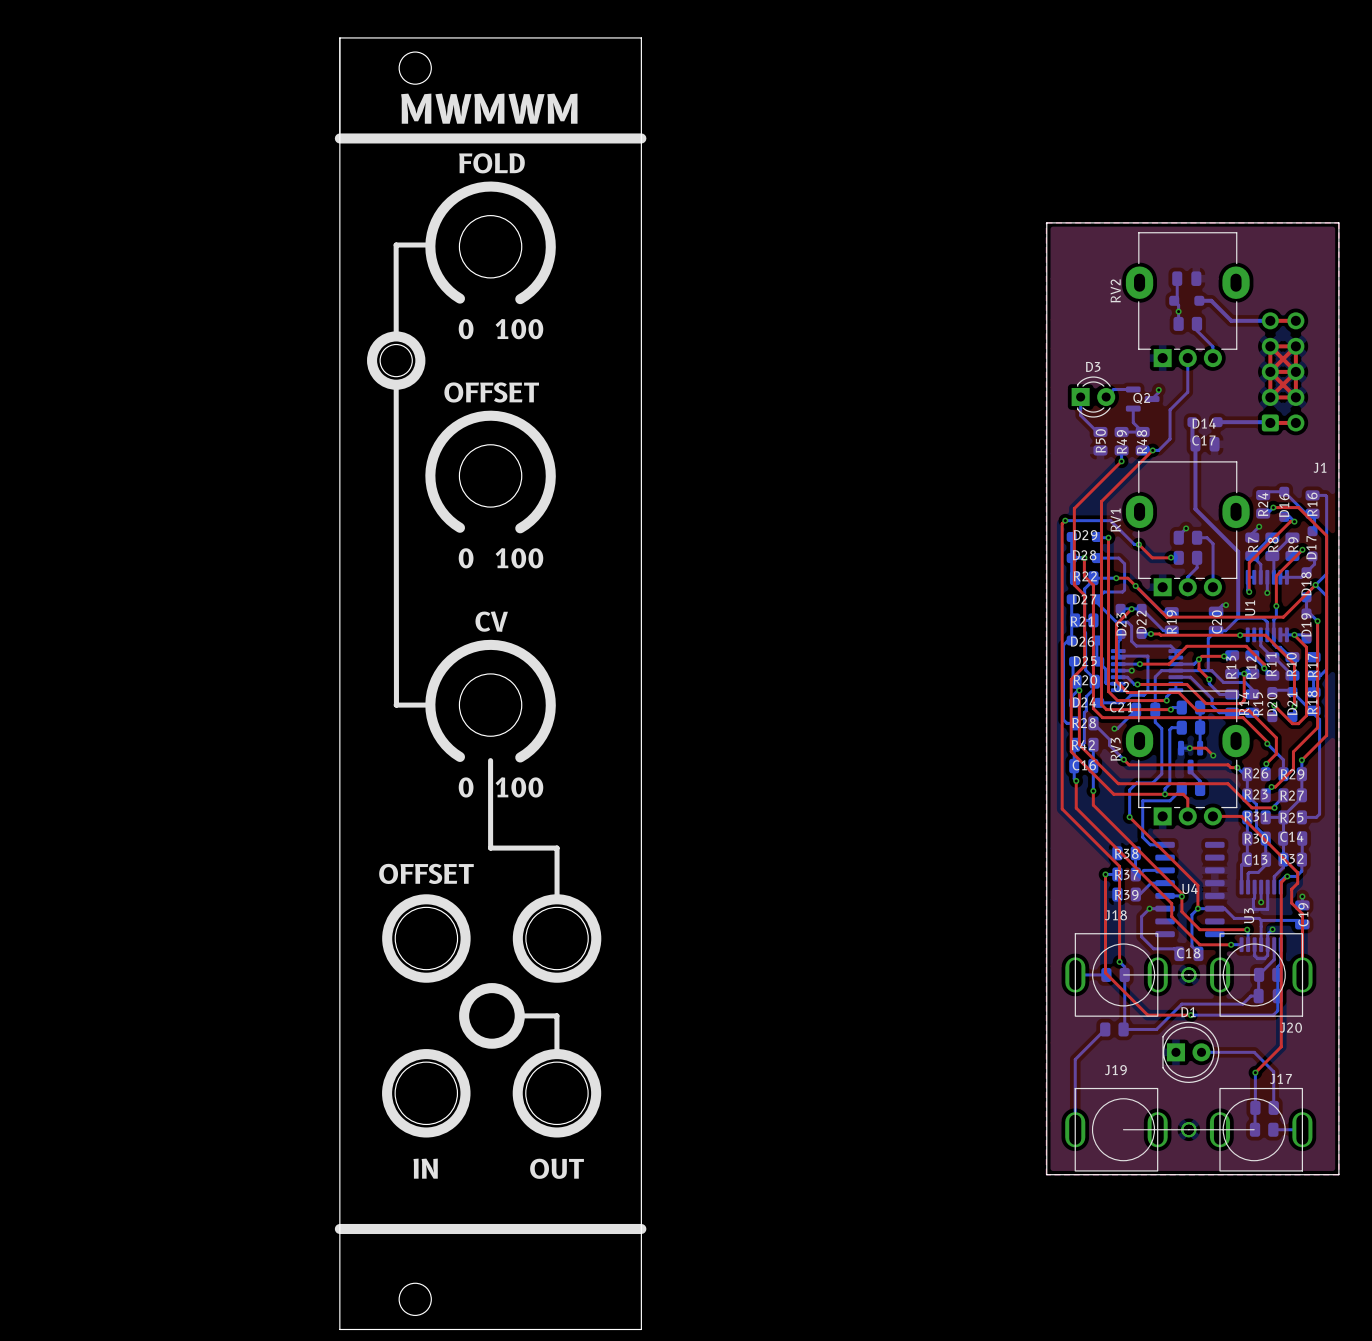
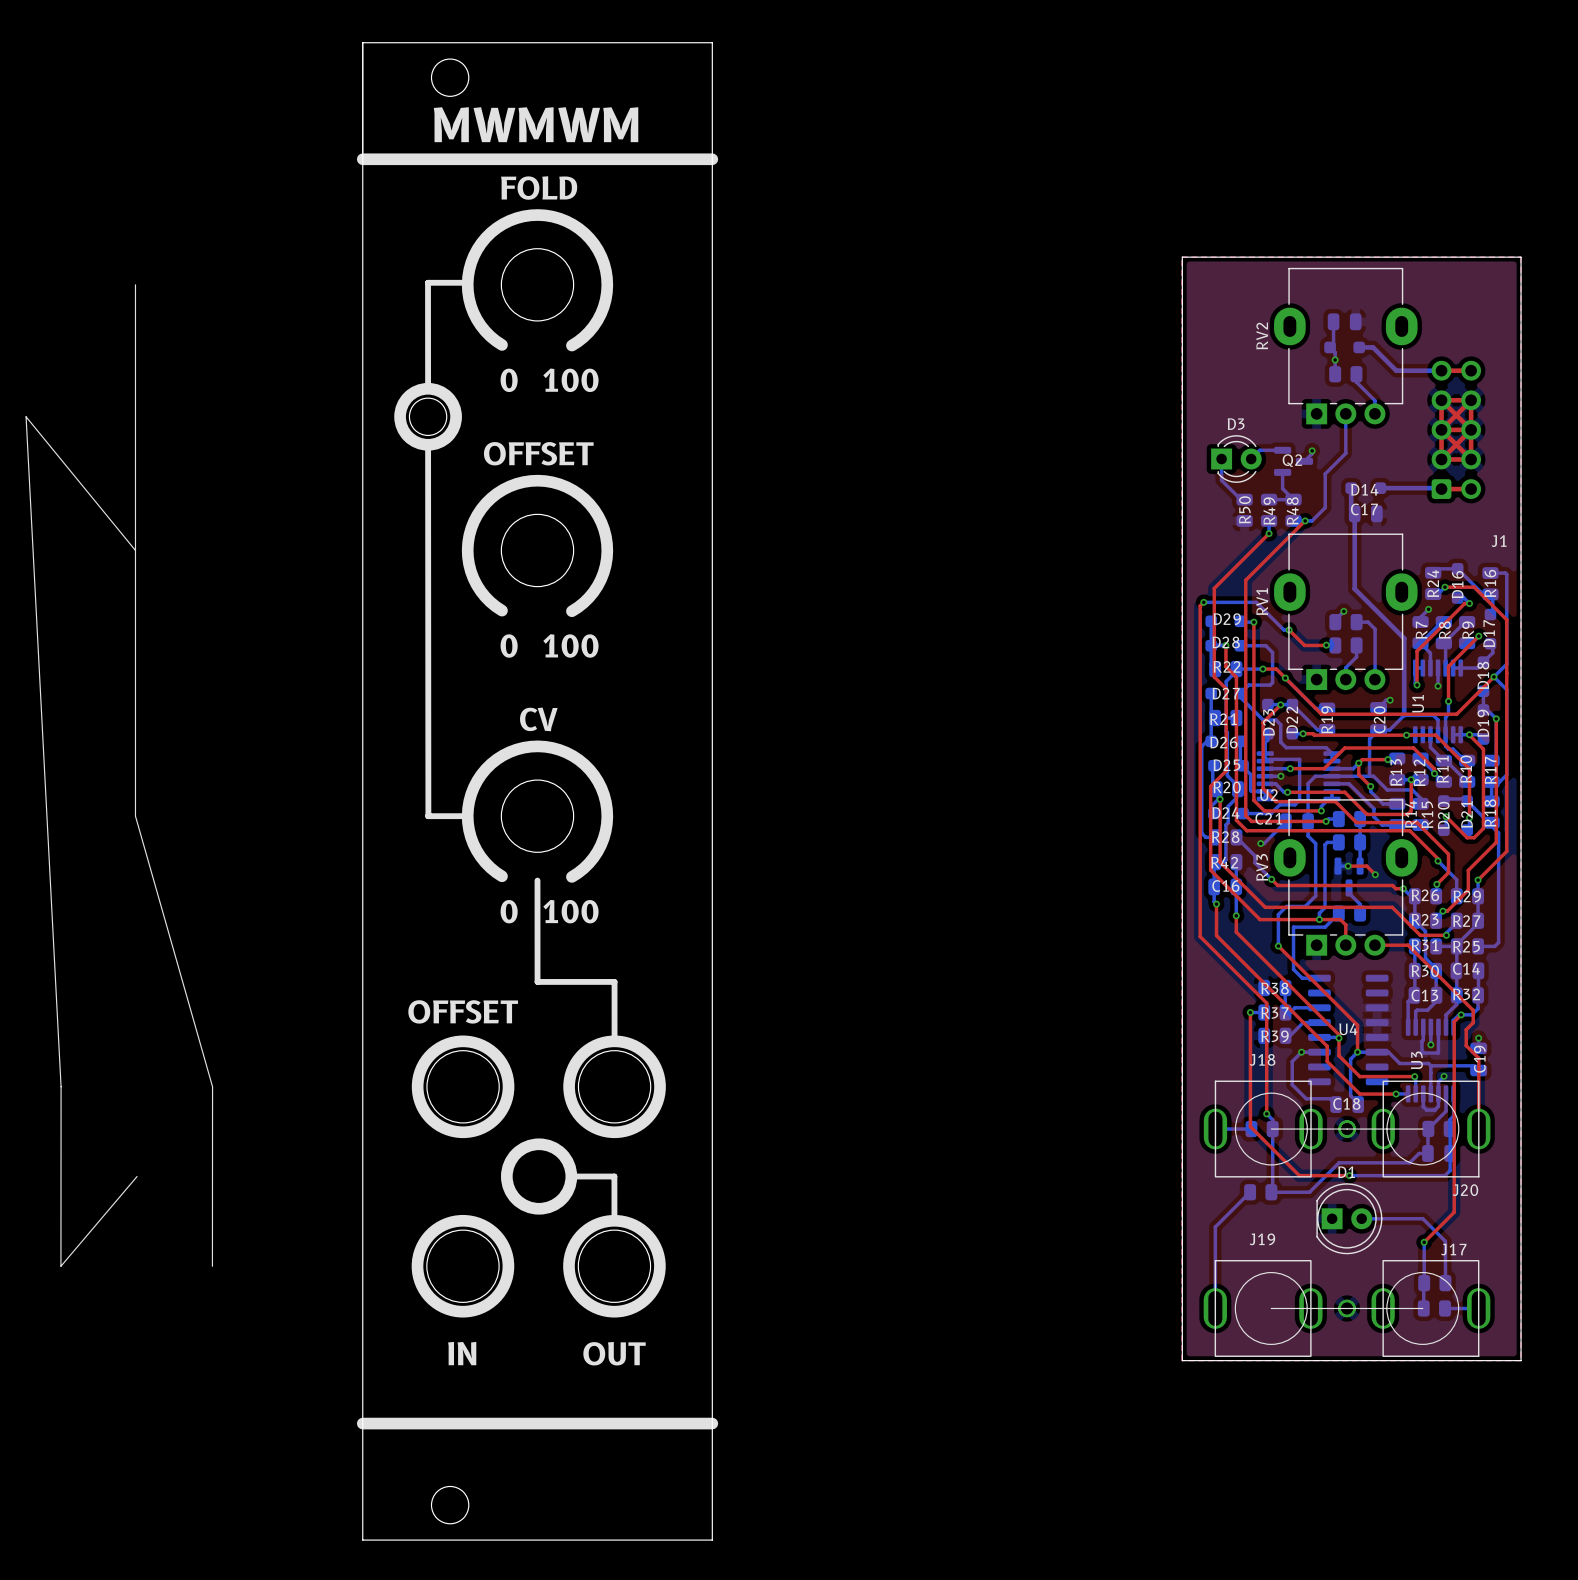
line: none -> (135, 284) (135, 816) (212, 1086) (212, 1266)
line: none -> (135, 550) (26, 416) (61, 1086) (60, 1266) (137, 1176)

